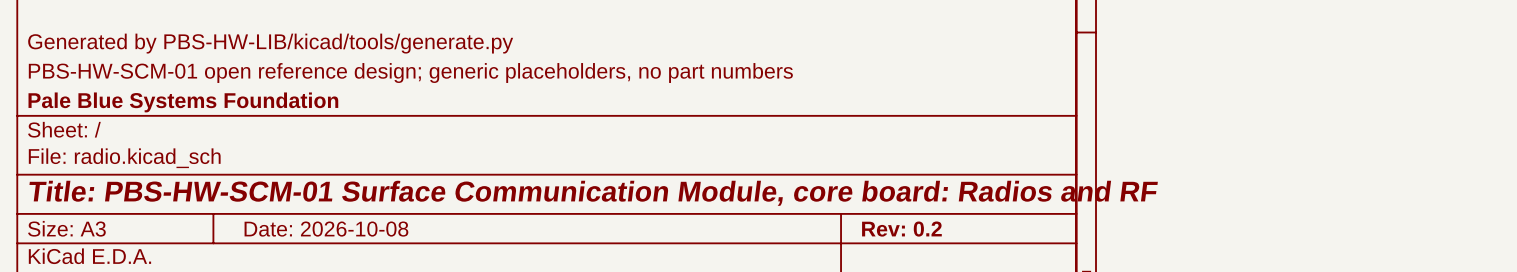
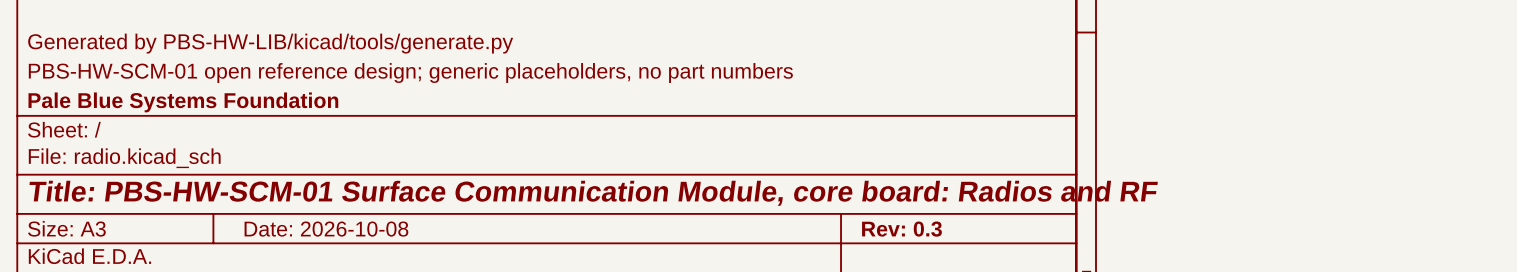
title block: Rev: 0.2 (901, 229) -> Rev: 0.3 (901, 229)

